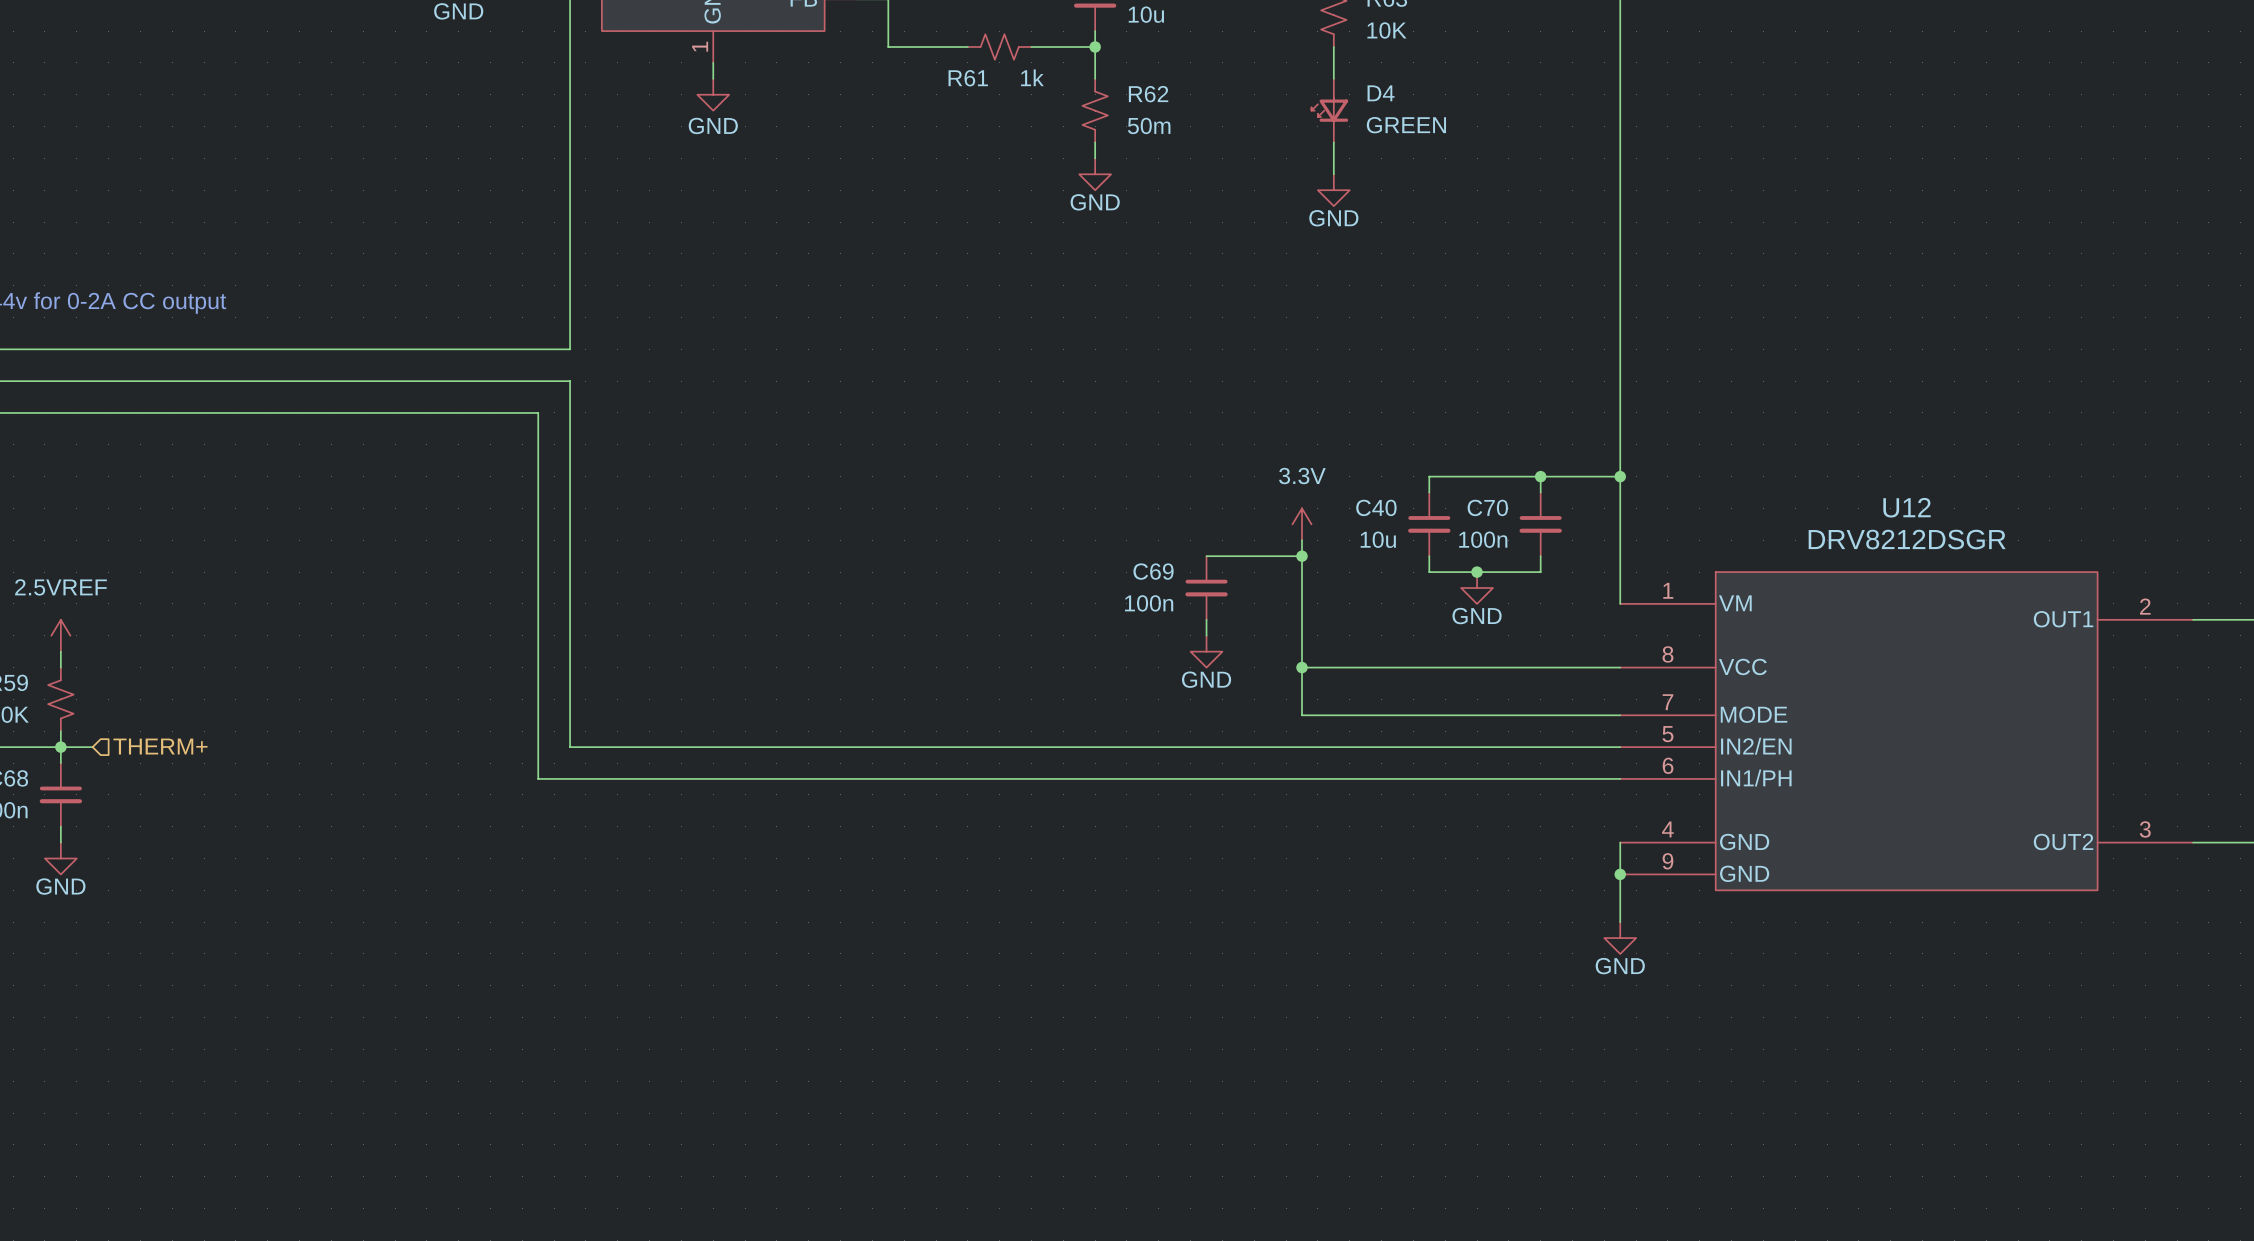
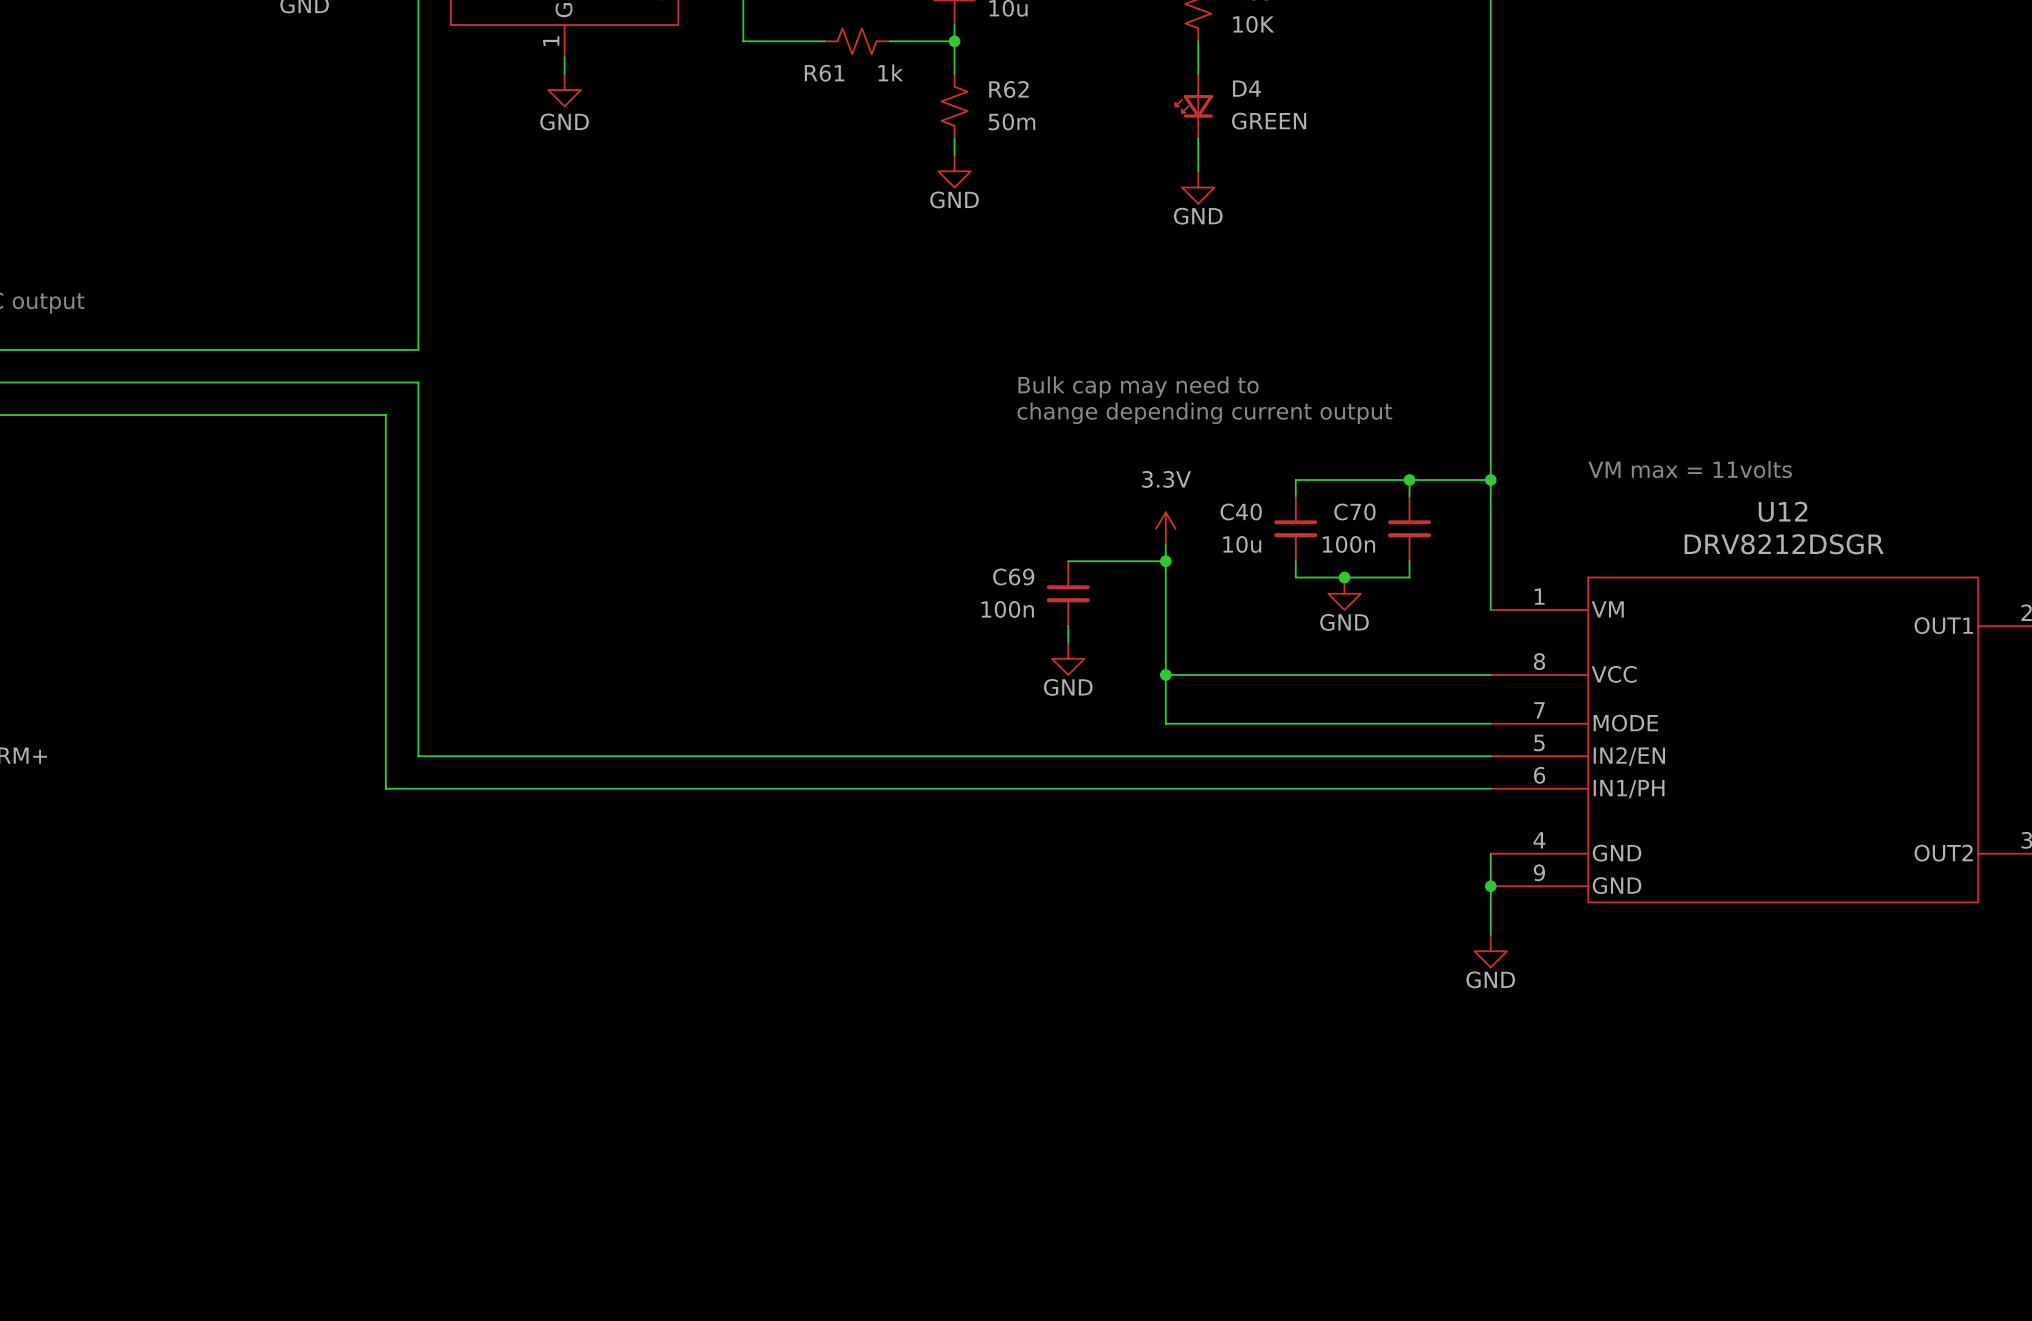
text: none -> Bulk cap may need to (1138, 387)
text: none -> change depending current output (1204, 413)
text: none -> VM max = 11volts (1690, 469)

